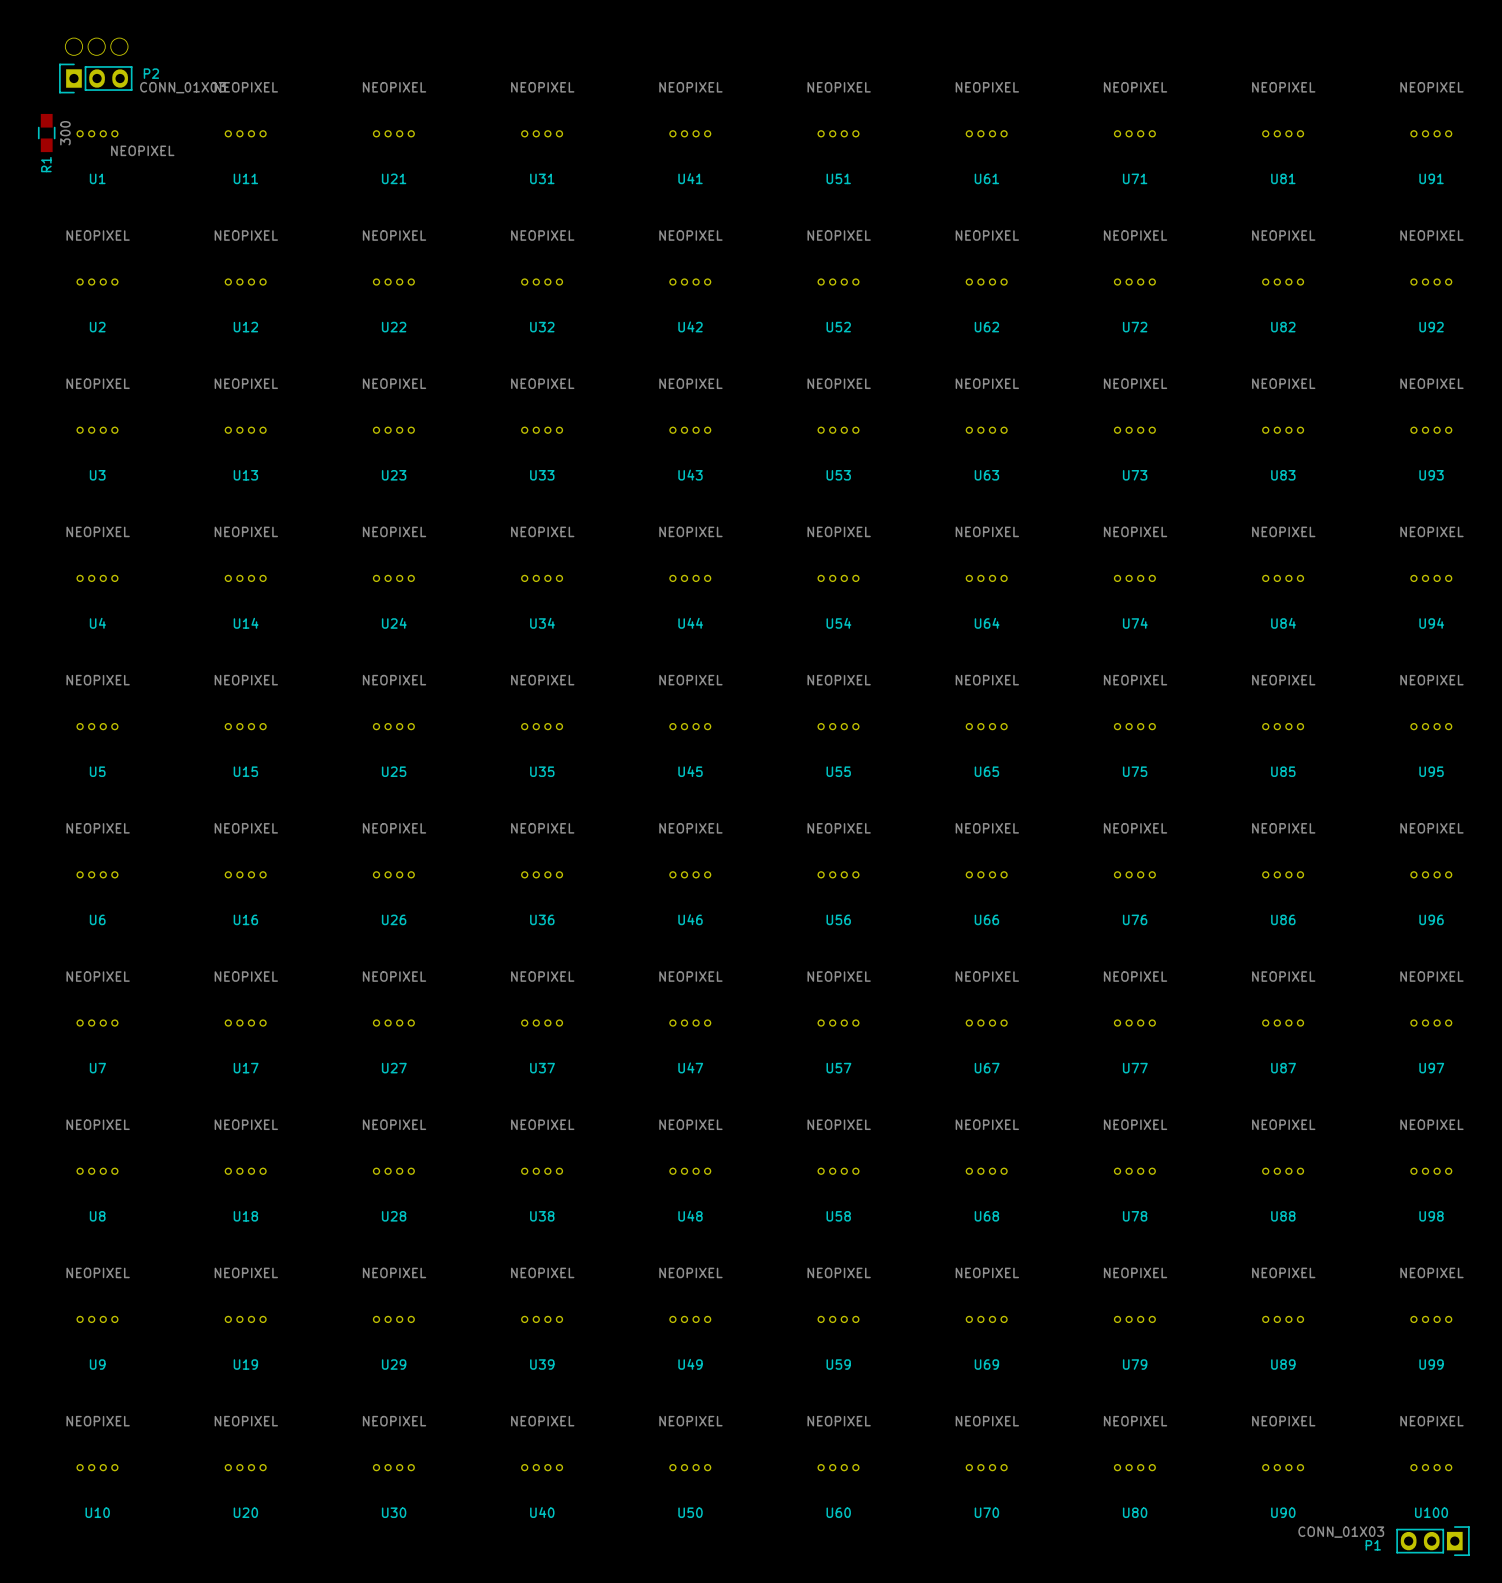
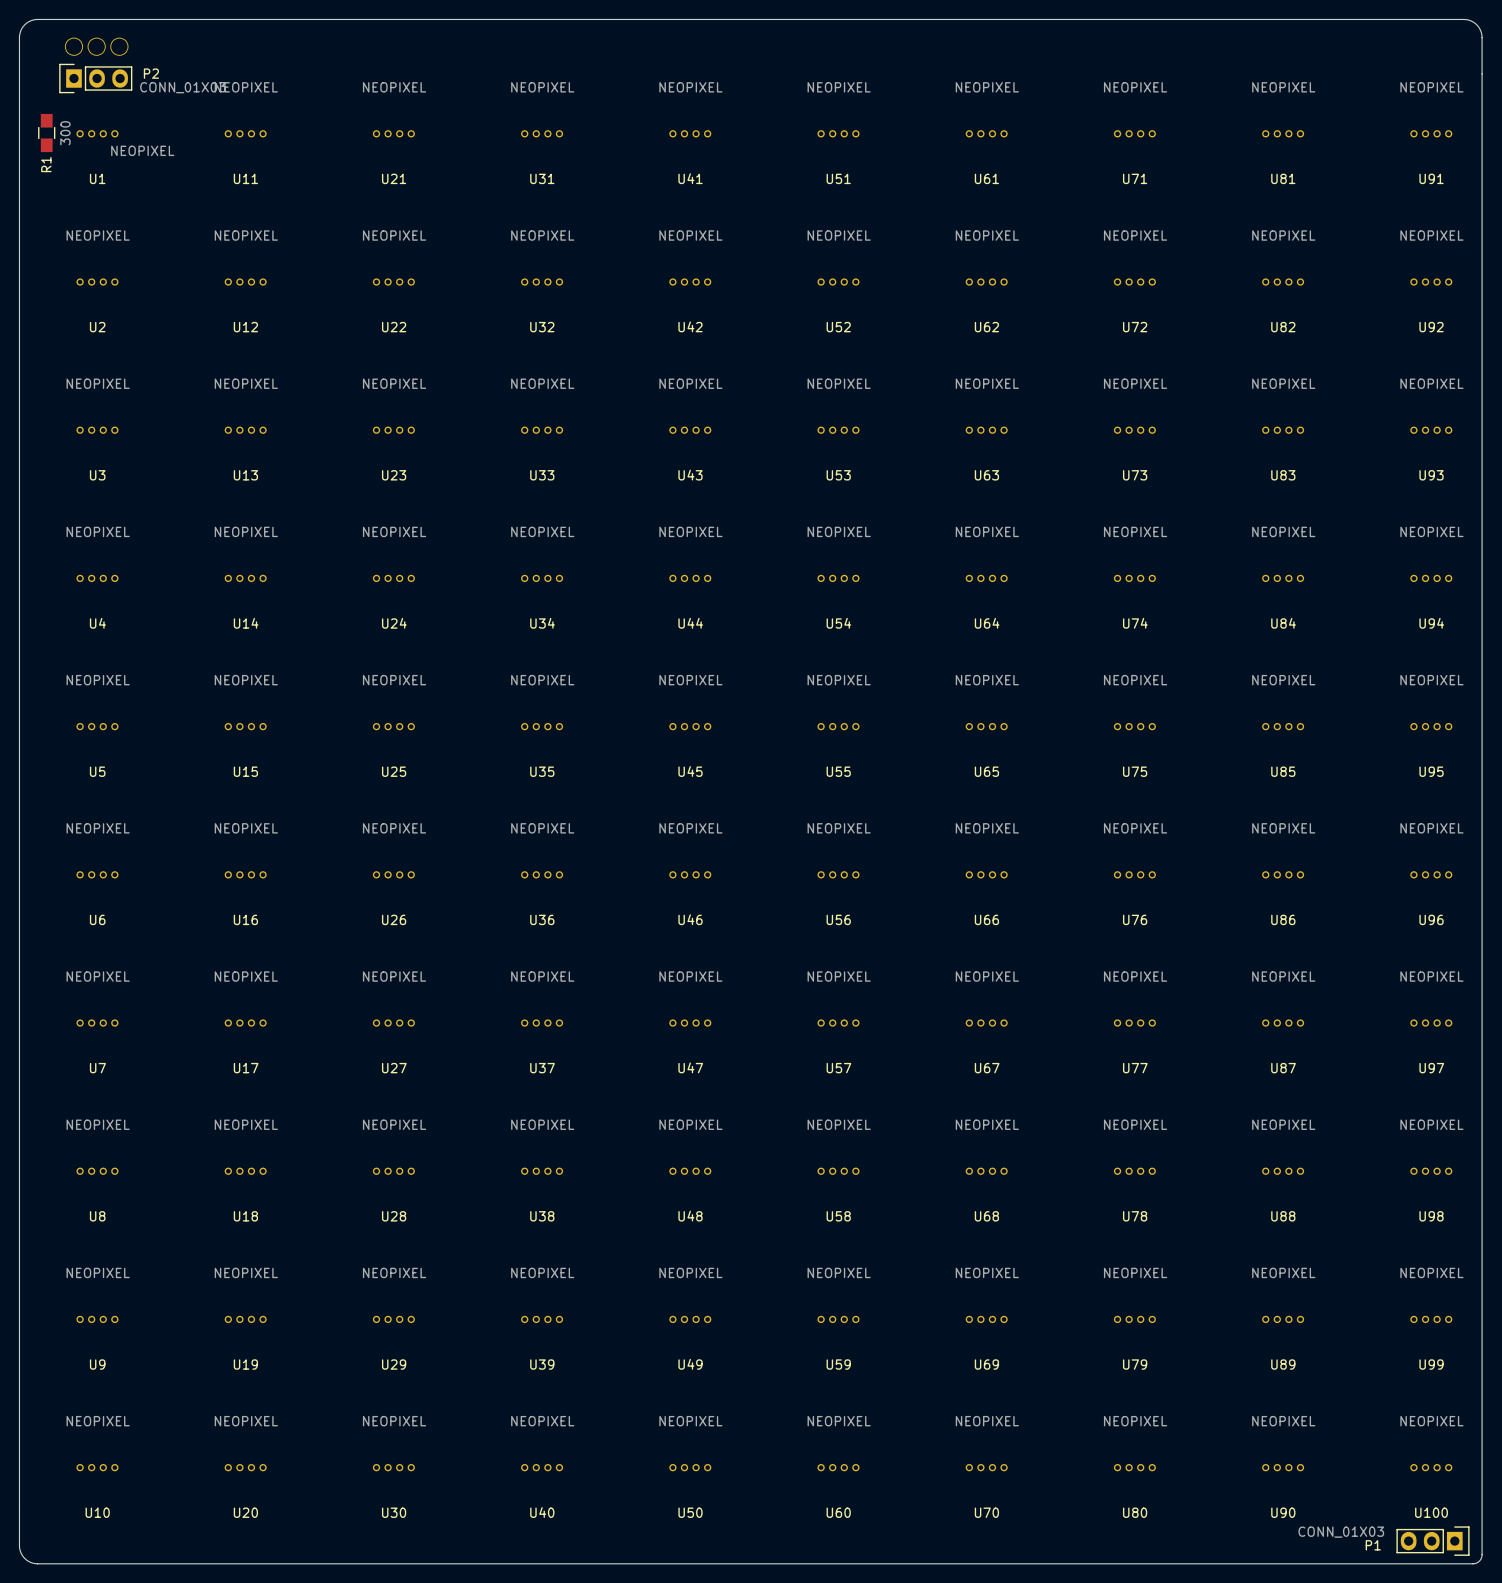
board edge: none -> (37, 19) (1463, 19) (1476, 24) (1482, 37) (1482, 1554) (1479, 1561) (1472, 1563) (37, 1563) (24, 1558) (19, 1545) (19, 37) (24, 24) (37, 19)

